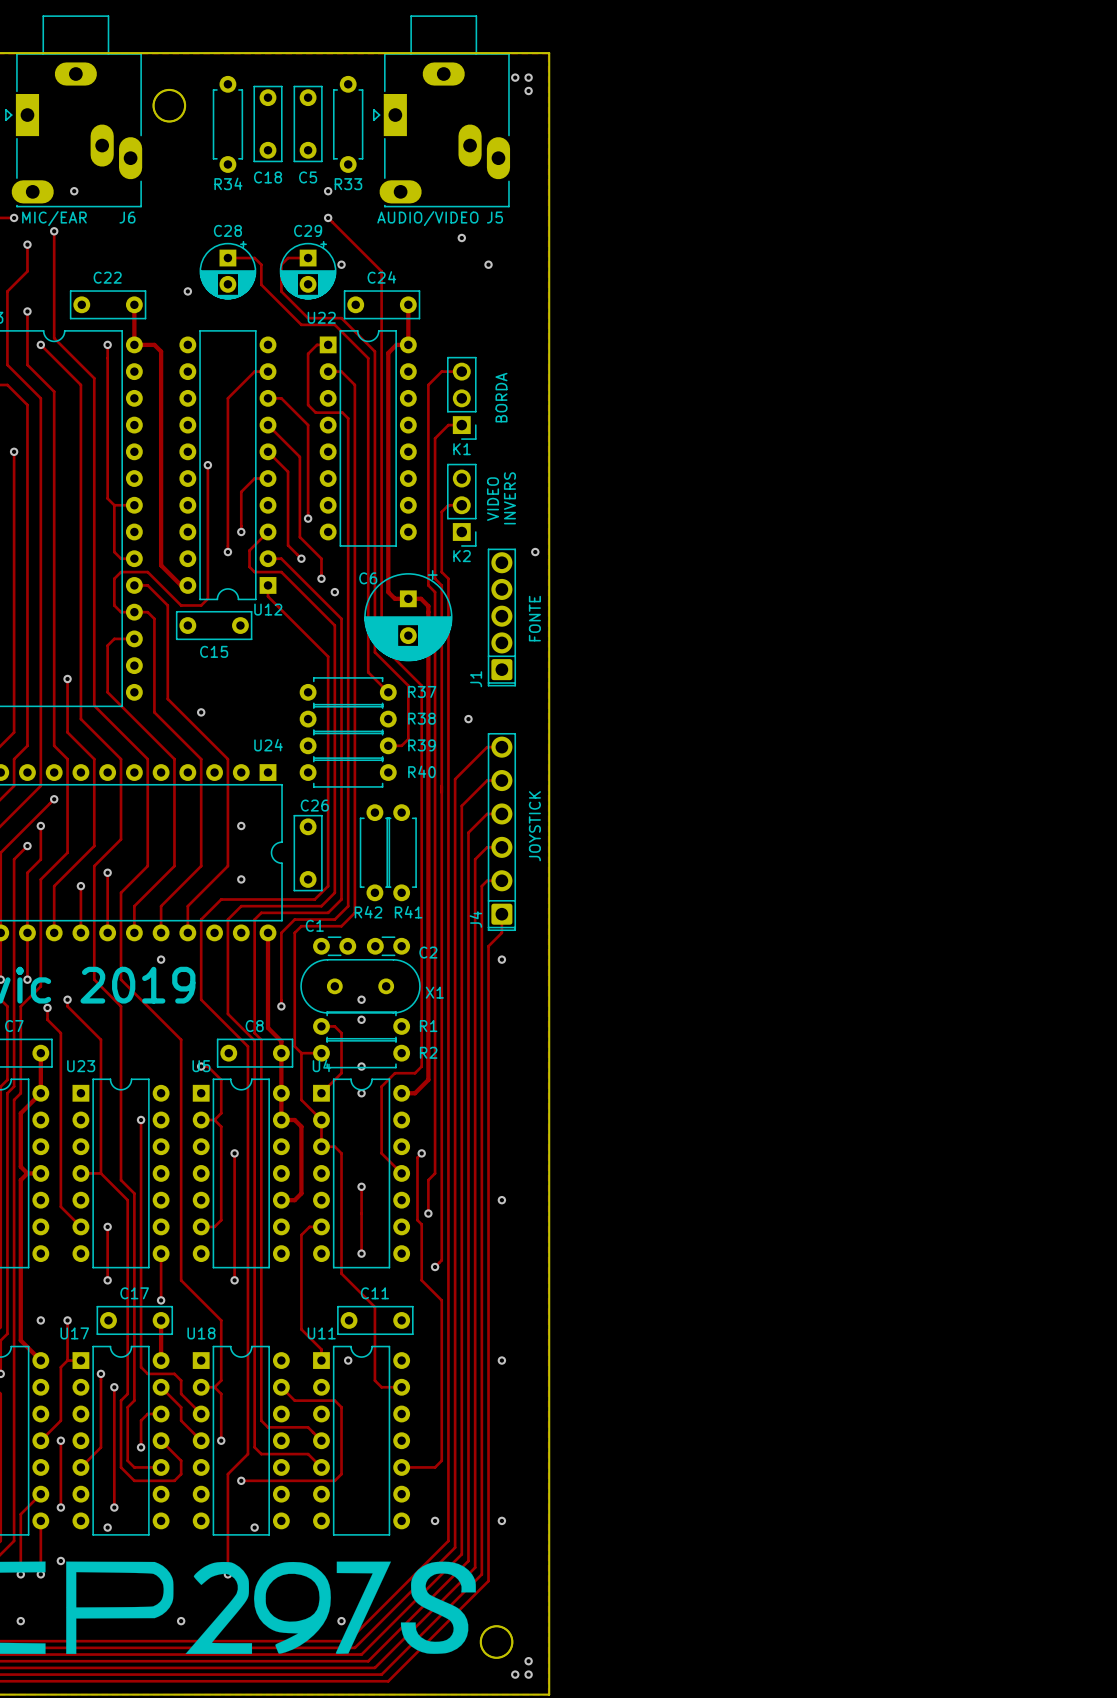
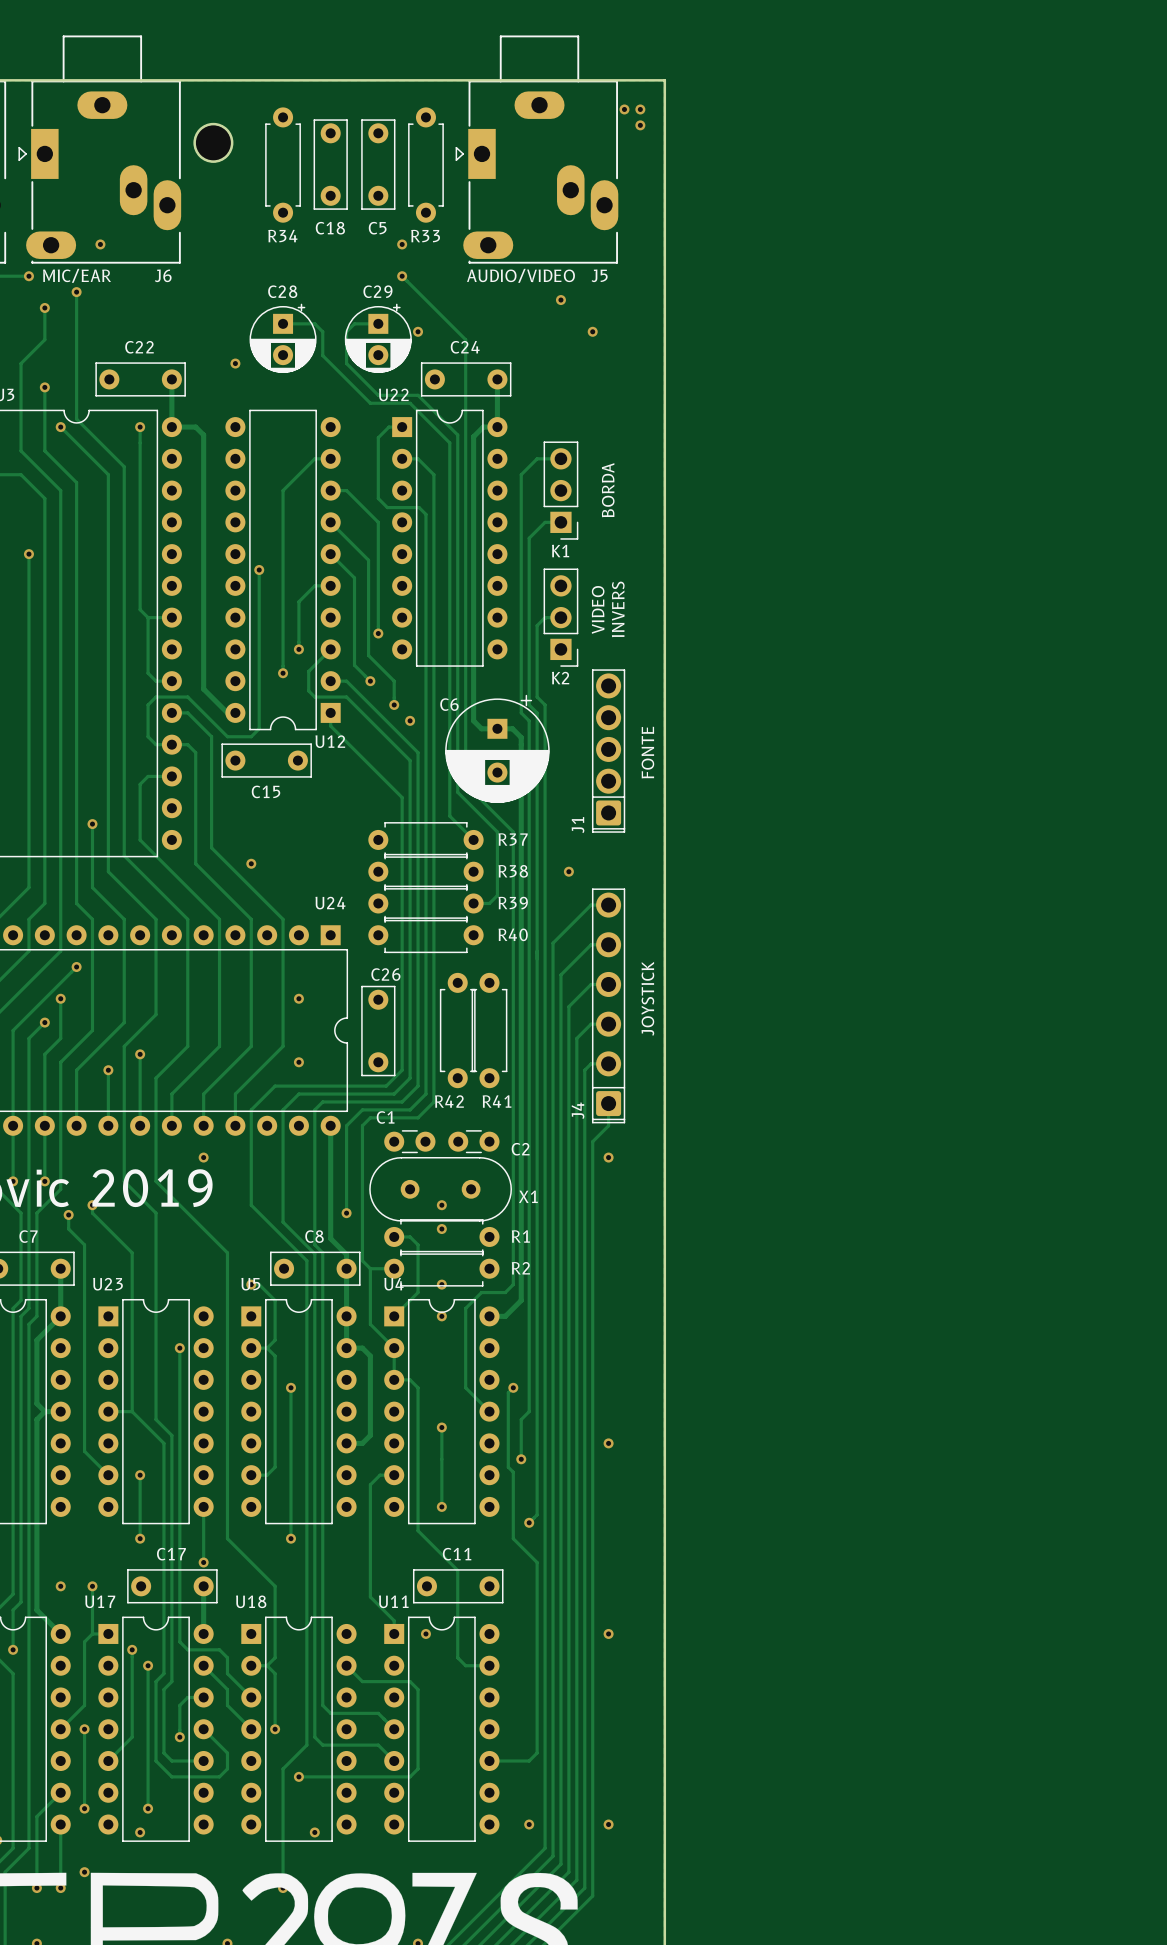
via: (535, 552) -> none

